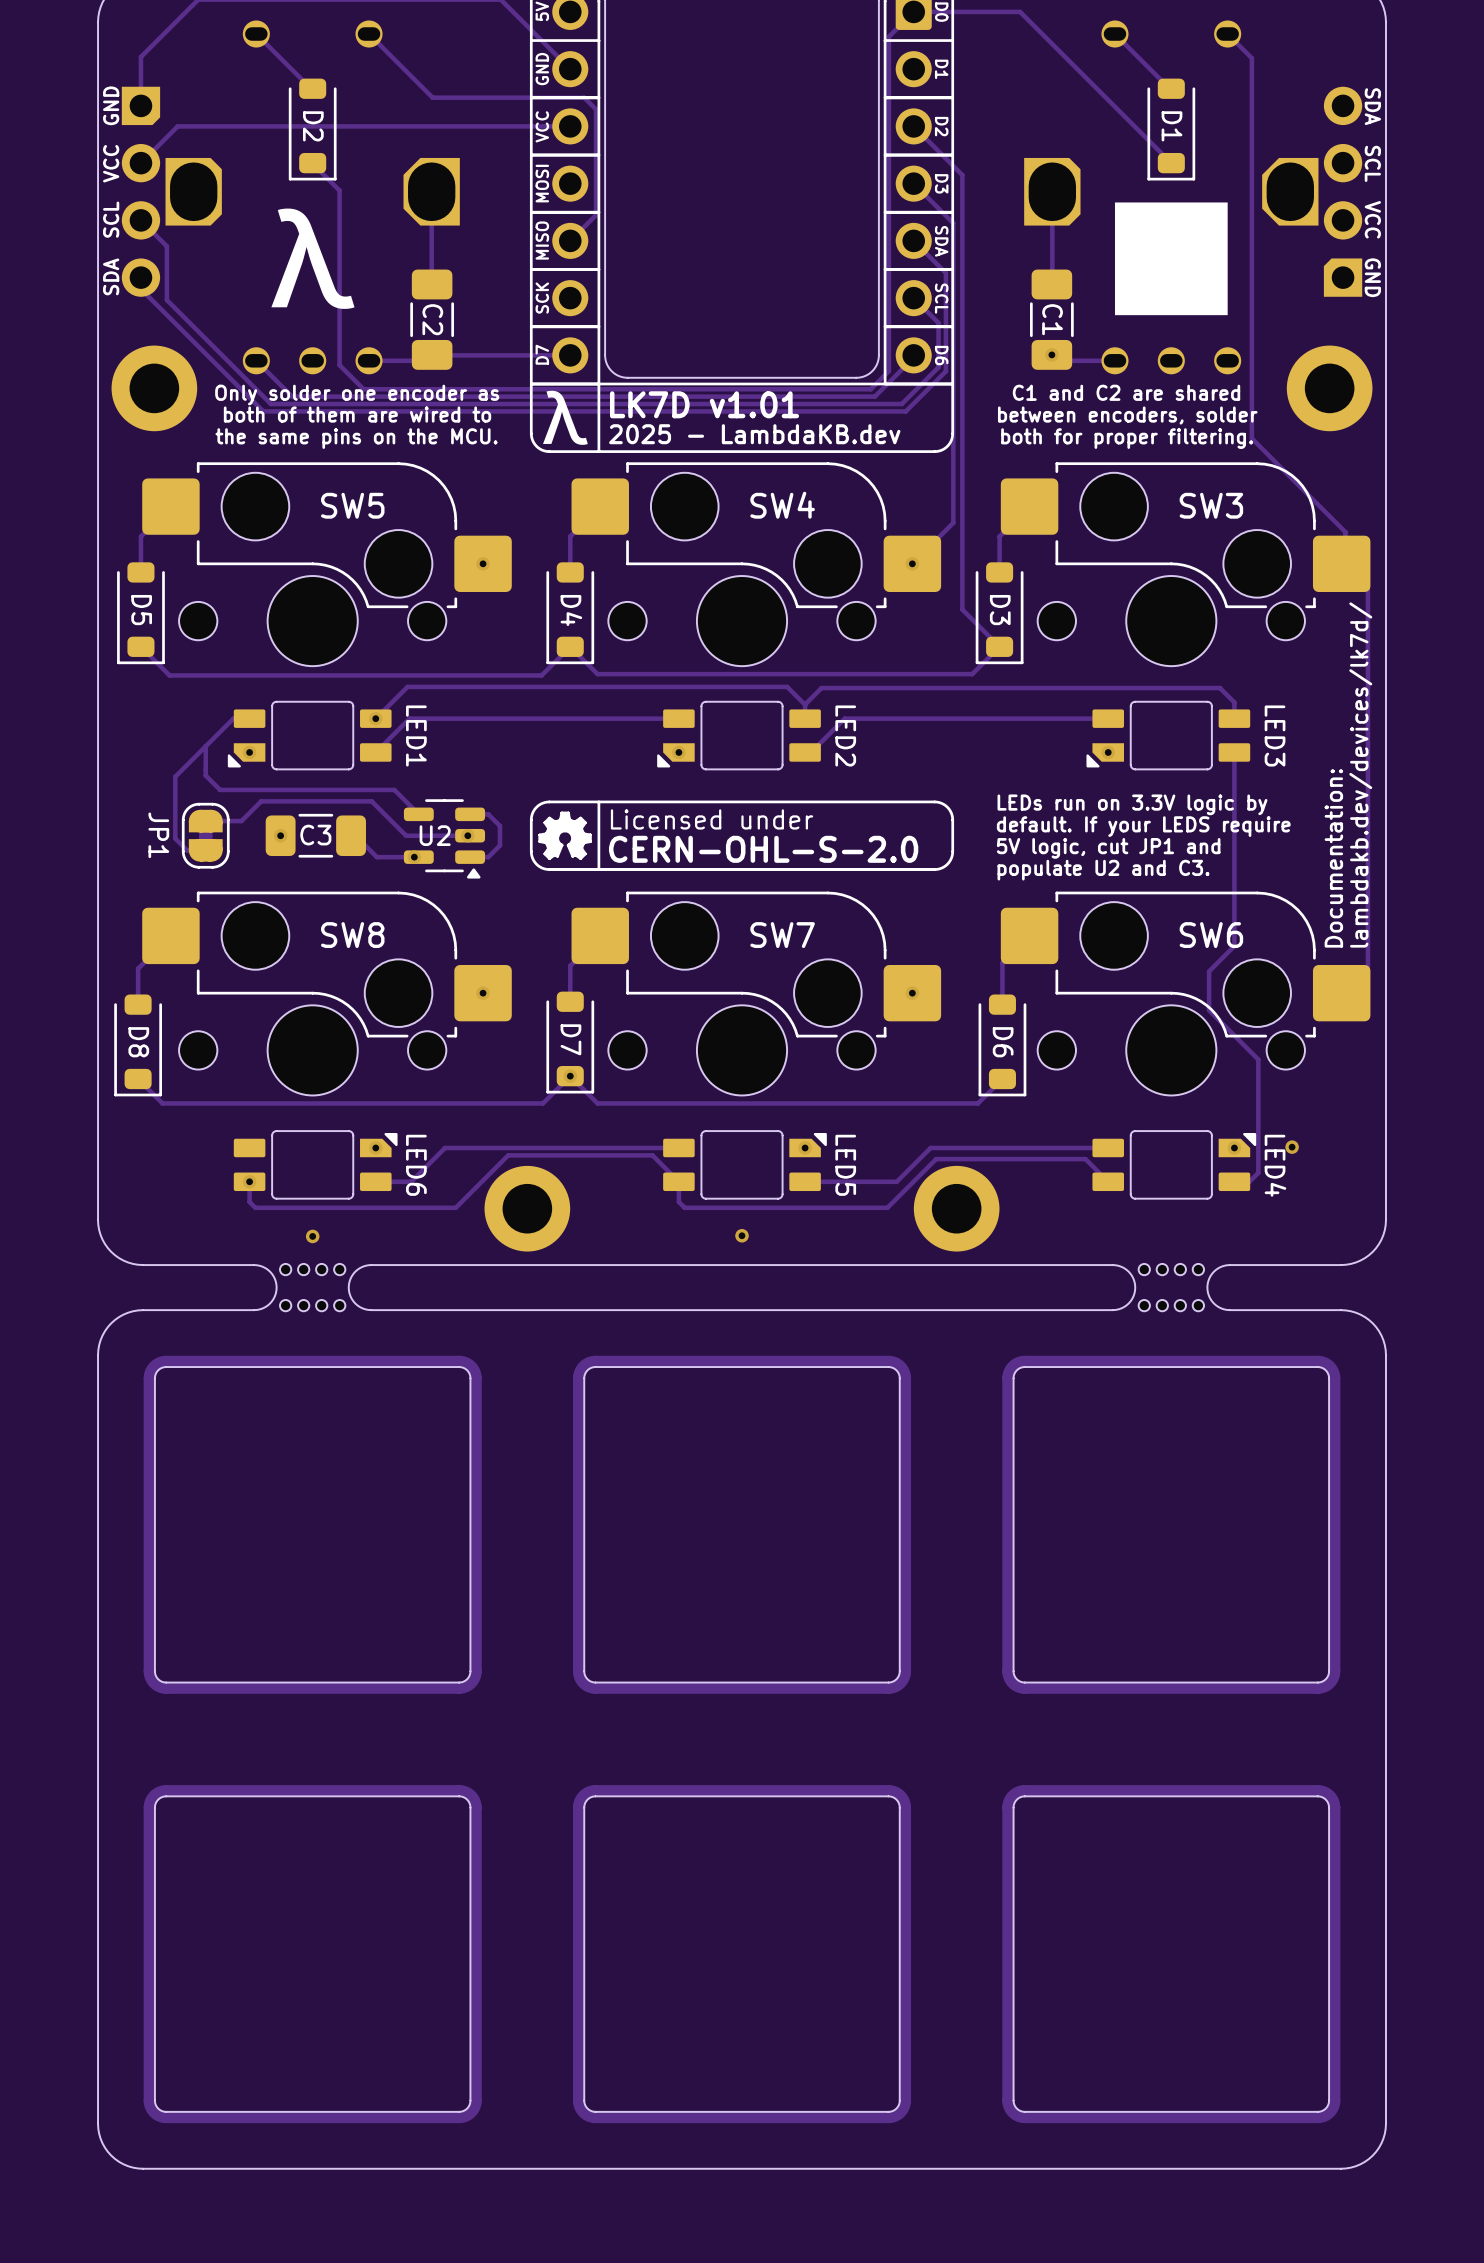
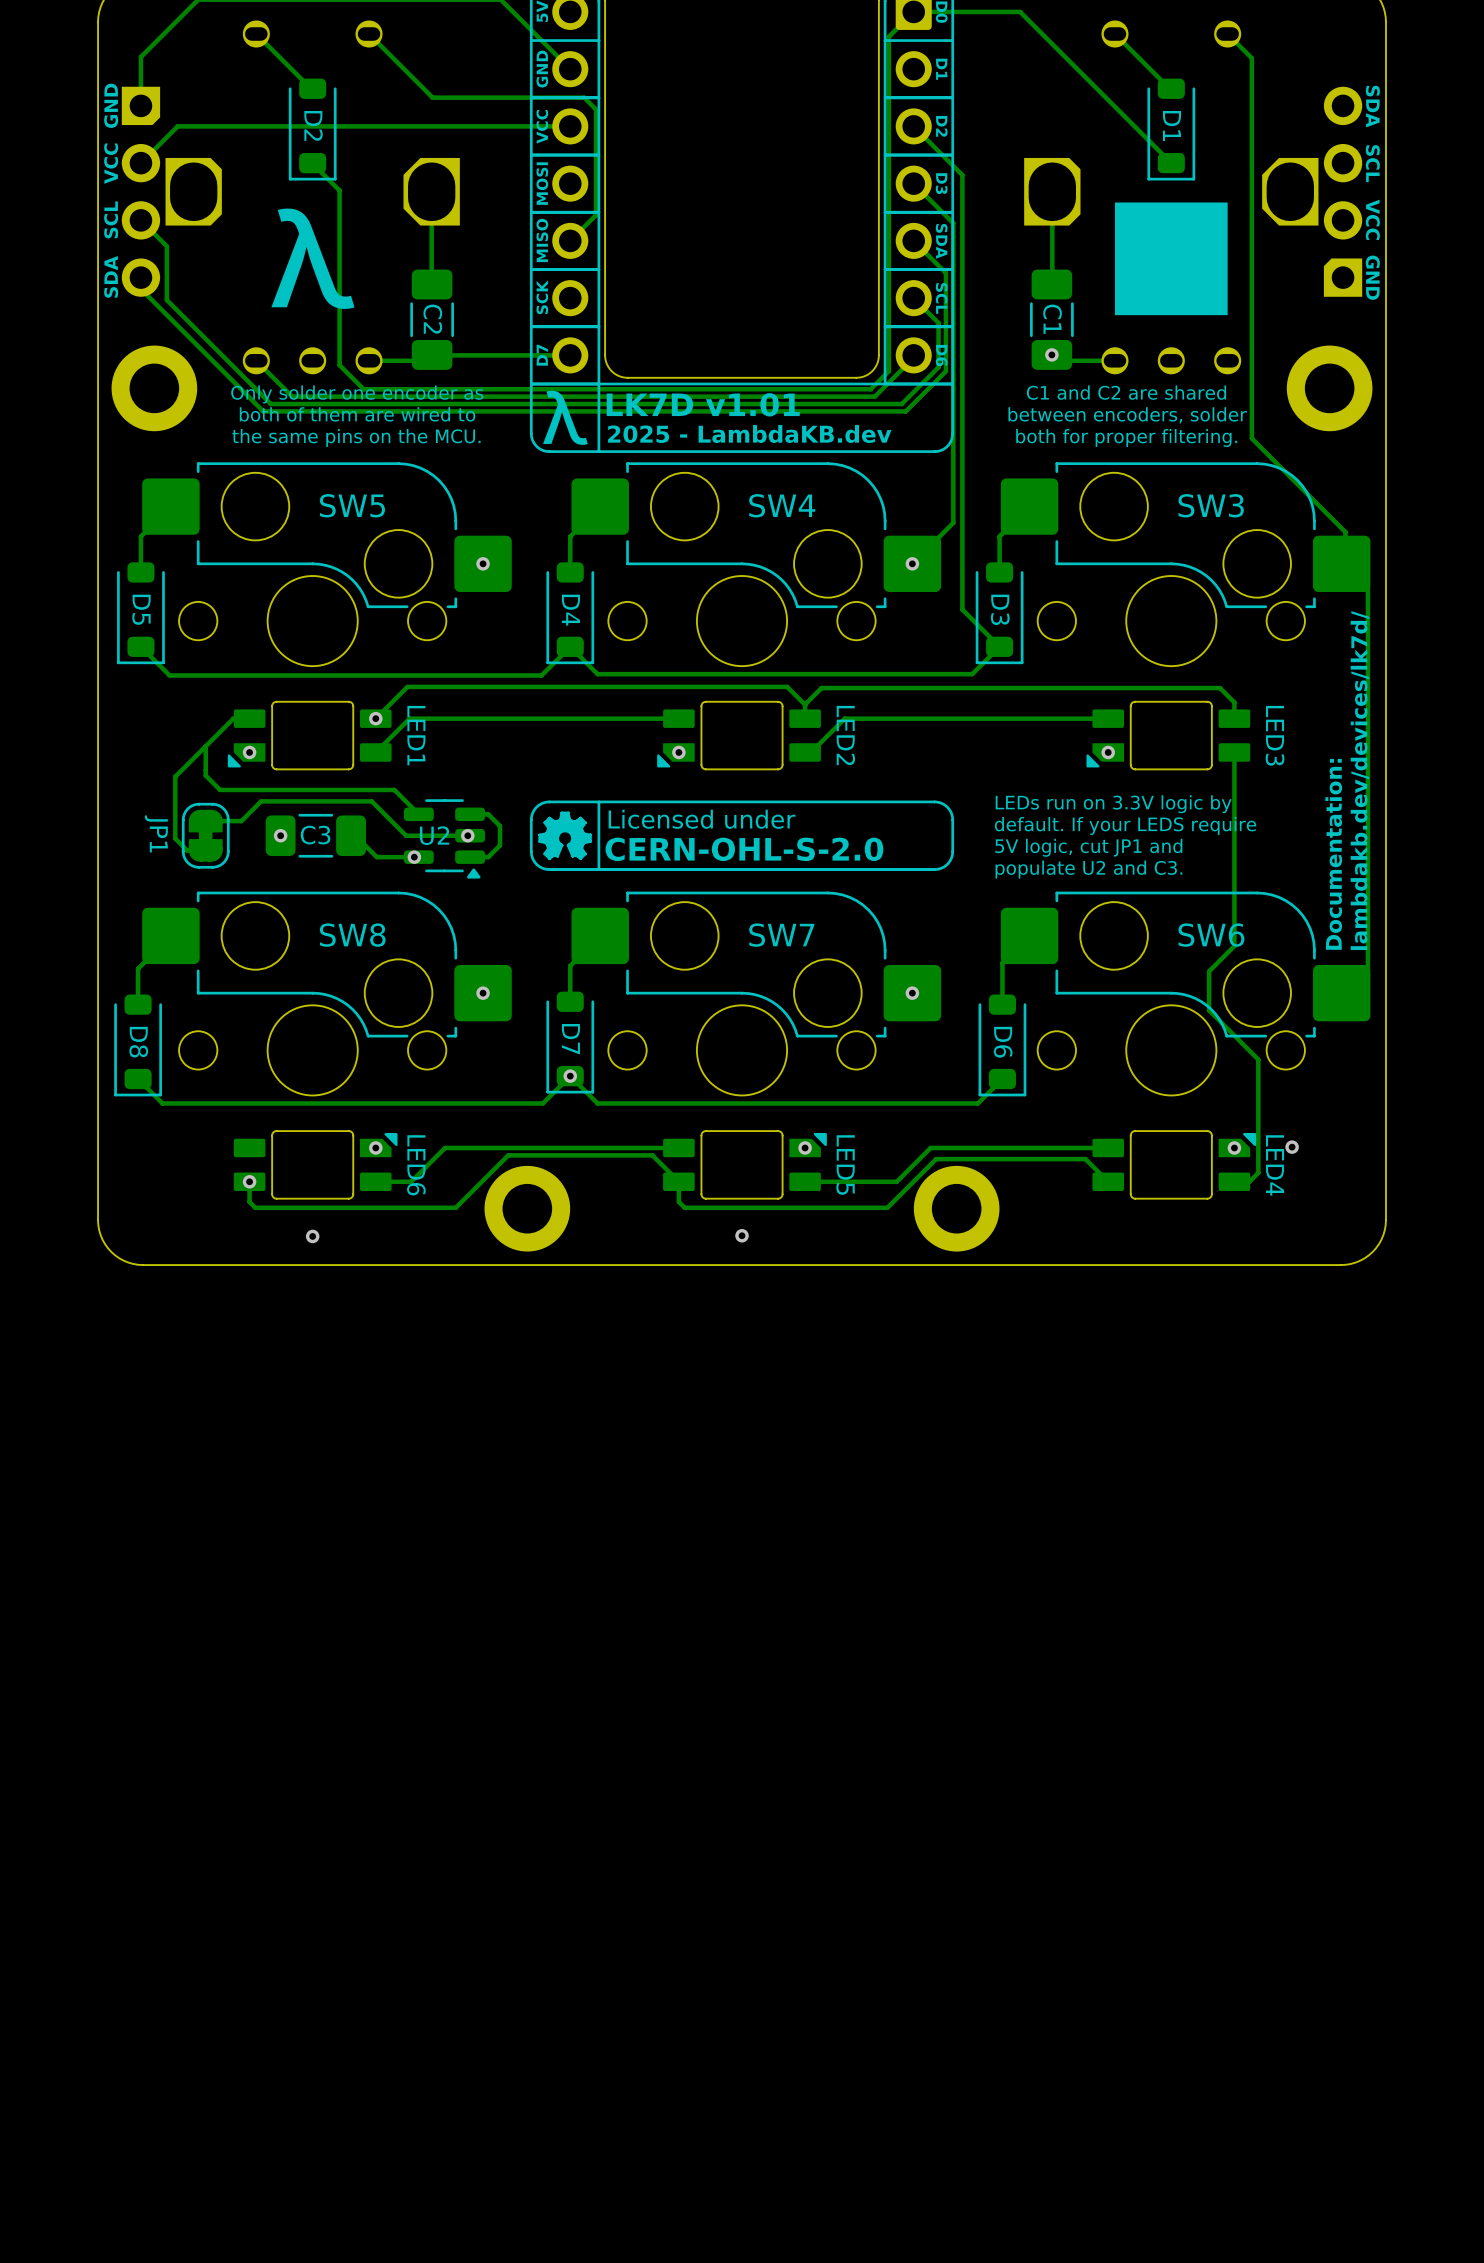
board edge: (1112, 1265) (1121, 1266) (1128, 1271) (1133, 1278) (1135, 1287) (1133, 1296) (1128, 1303) (1121, 1308) (1112, 1310) (371, 1310) (362, 1308) (355, 1303) (350, 1296) (348, 1287) (350, 1278) (355, 1271) (362, 1266) (371, 1265) -> (254, 1265) (371, 1265)
board edge: (1229, 1265) (1216, 1269) (1208, 1281) (1209, 1296) (1218, 1307) (1229, 1310) (1350, 1311) (1364, 1317) (1372, 1323) (1381, 1335) (1385, 1350) (1385, 2123) (1383, 2138) (1376, 2151) (1364, 2161) (1345, 2168) (143, 2168) (128, 2166) (115, 2158) (102, 2143) (98, 2123) (98, 1350) (100, 1340) (107, 1327) (119, 1317) (133, 1311) (254, 1310) (265, 1307) (274, 1296) (275, 1281) (267, 1269) (254, 1265) -> (1229, 1265) (1112, 1265)
part: (312, 1287) -> none
part: (1171, 1287) -> none
drawing: [143, 1355, 482, 1694] -> none
drawing: [572, 1355, 912, 1694] -> none
drawing: [1002, 1355, 1341, 1694] -> none
drawing: [143, 1785, 482, 2124] -> none
drawing: [572, 1785, 912, 2124] -> none
drawing: [1002, 1785, 1341, 2124] -> none

